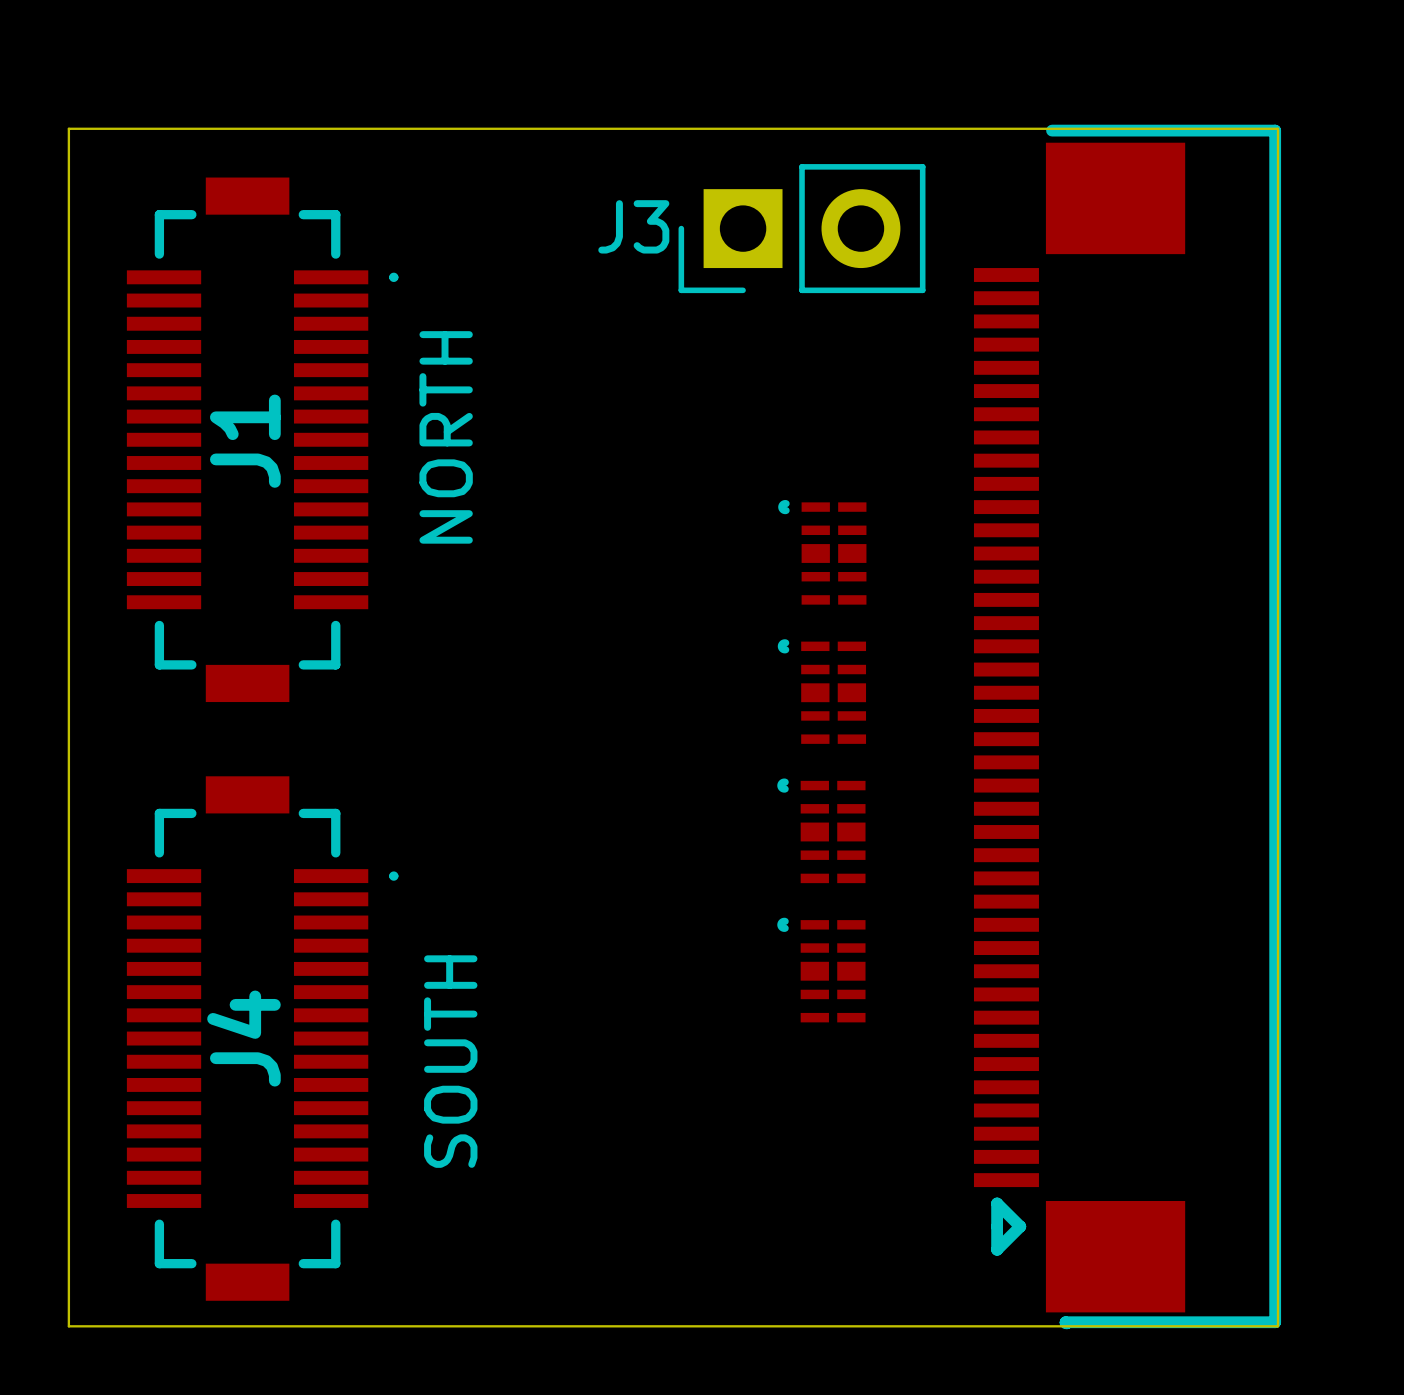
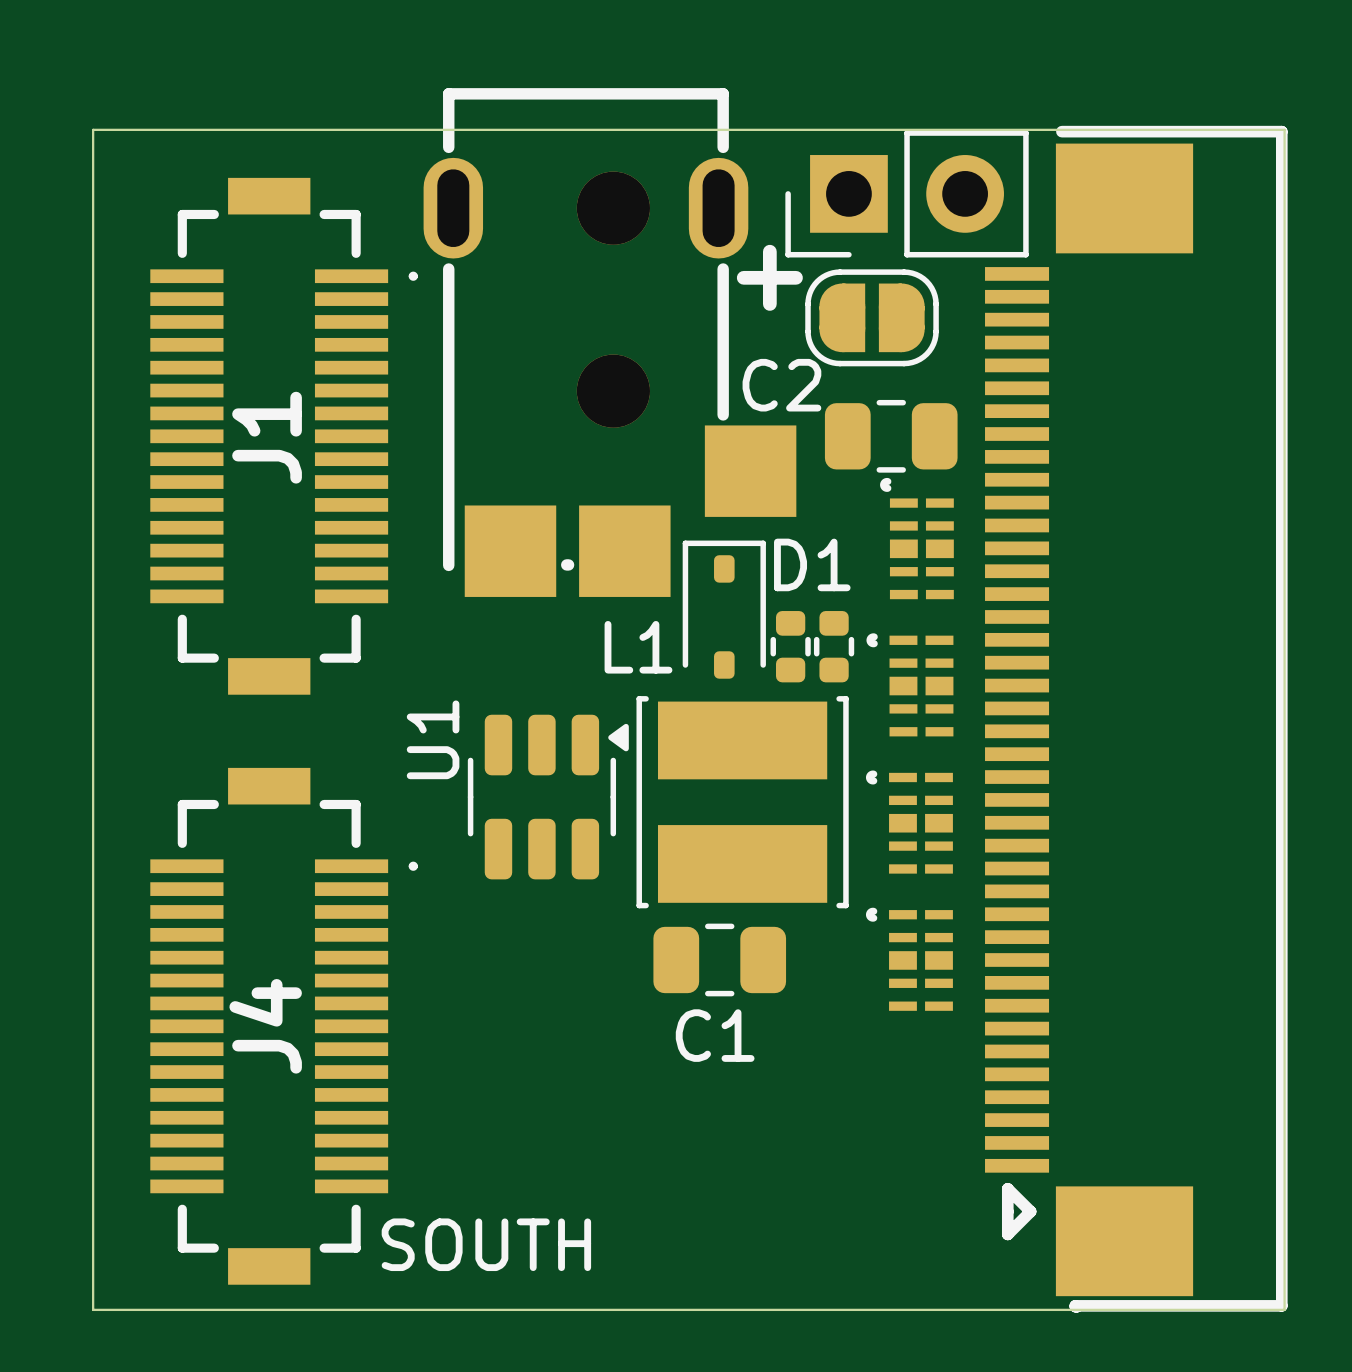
part: none -> (907, 193)
J3: (802, 228) -> none
text: none -> + (769, 277)
part: none -> (872, 317)
part: none -> (609, 342)
text: NORTH (446, 437) -> none
C2: none -> (891, 436)
part: none -> (916, 538)
part: (822, 552) -> none
D1: none -> (724, 609)
part: none -> (790, 646)
part: none -> (834, 646)
part position: (821, 691) -> (909, 684)
U1: none -> (548, 797)
L1: none -> (742, 802)
part position: (821, 830) -> (909, 822)
part position: (821, 970) -> (909, 959)
C1: none -> (719, 959)
text rotation: 0° (450, 1061) -> 90° clockwise (486, 1244)

